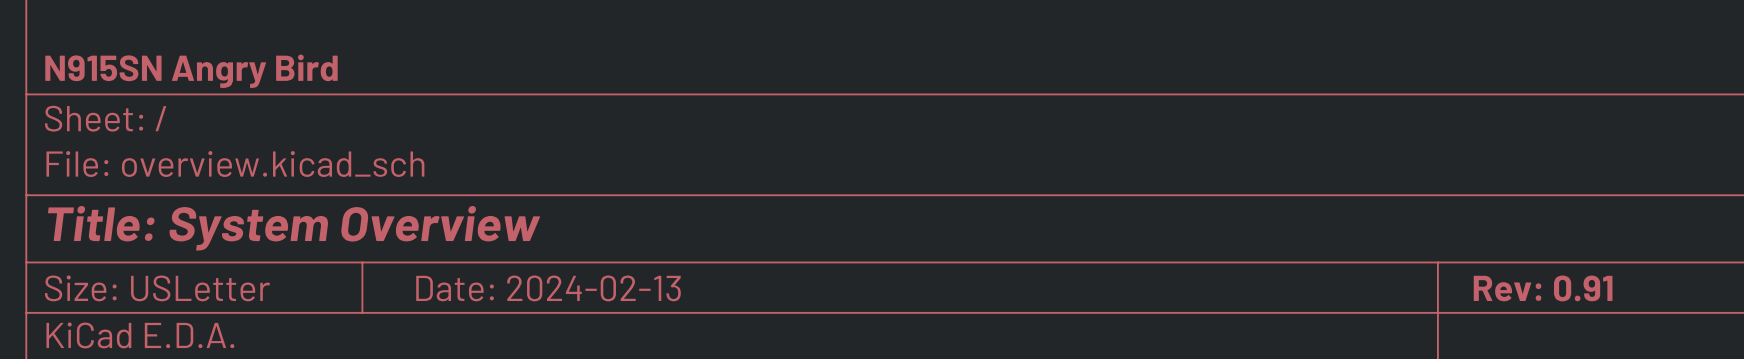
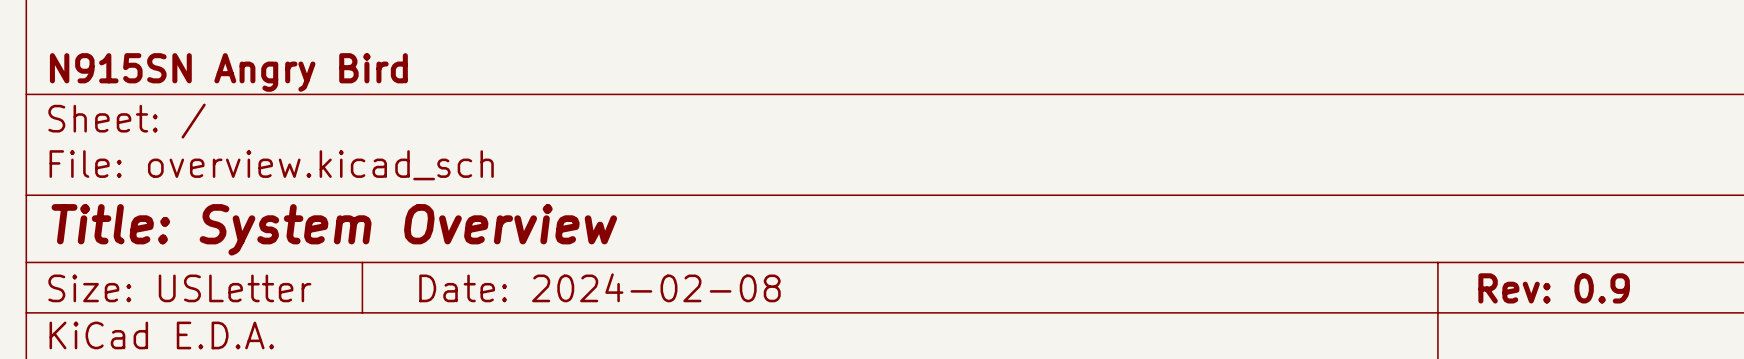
title block: Date: 2024-02-13 (548, 288) -> Date: 2024-02-08 (599, 287)
title block: Rev: 0.91 (1543, 288) -> Rev: 0.9 (1554, 288)

